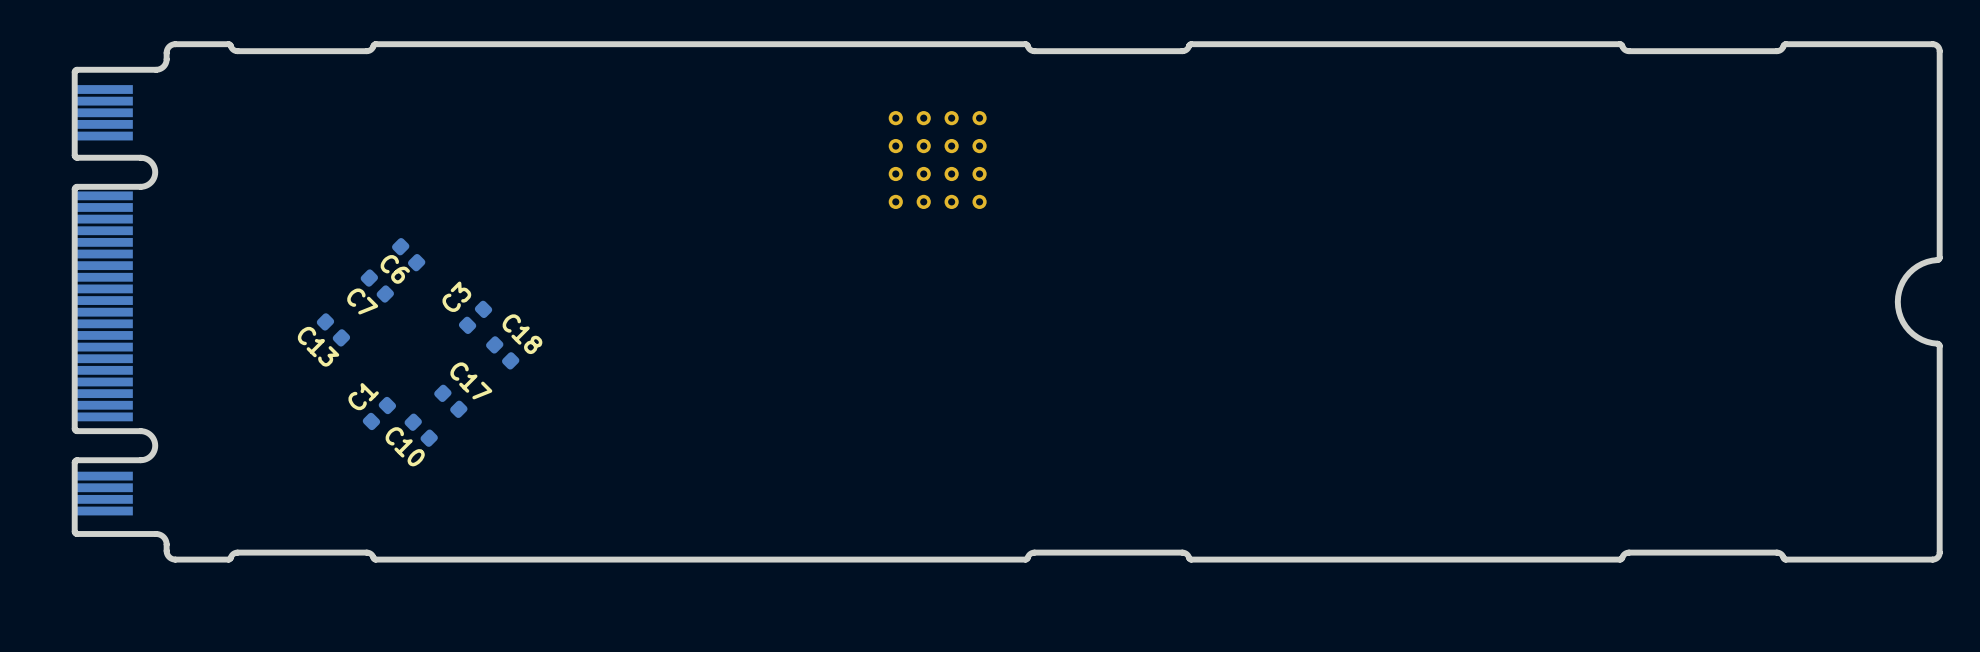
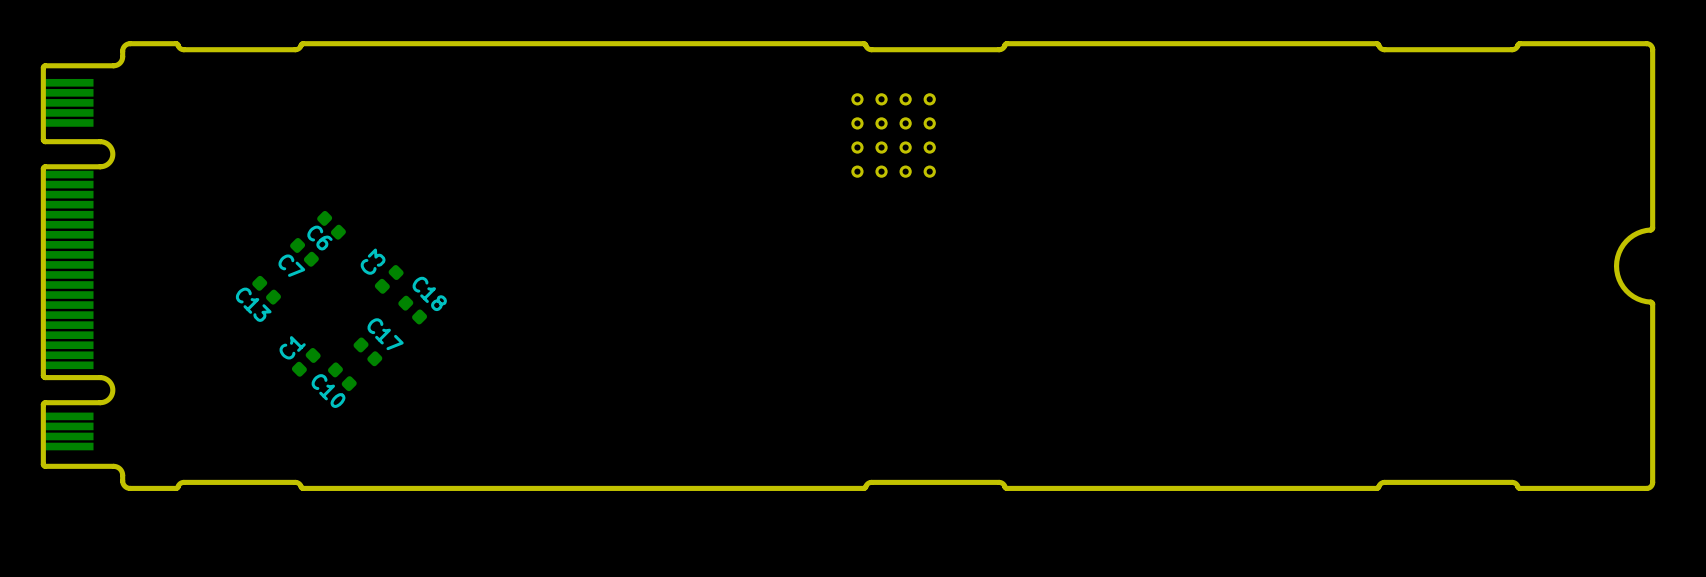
part position: (937, 160) -> (893, 135)

